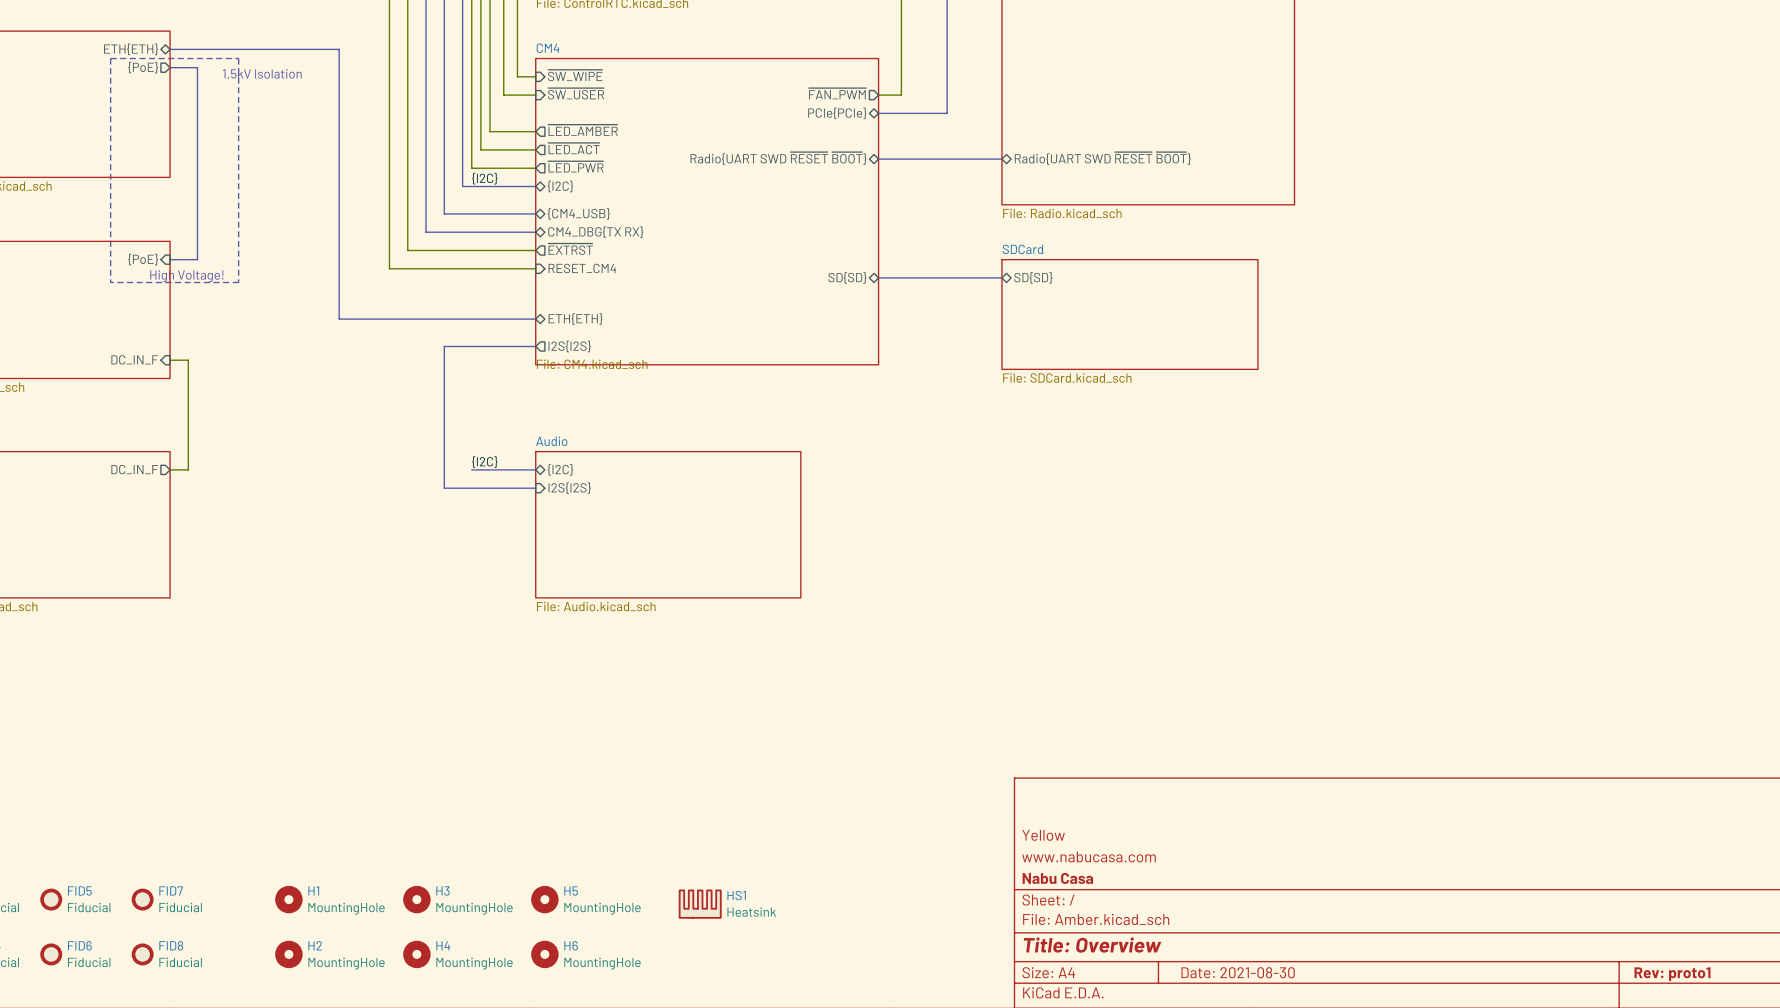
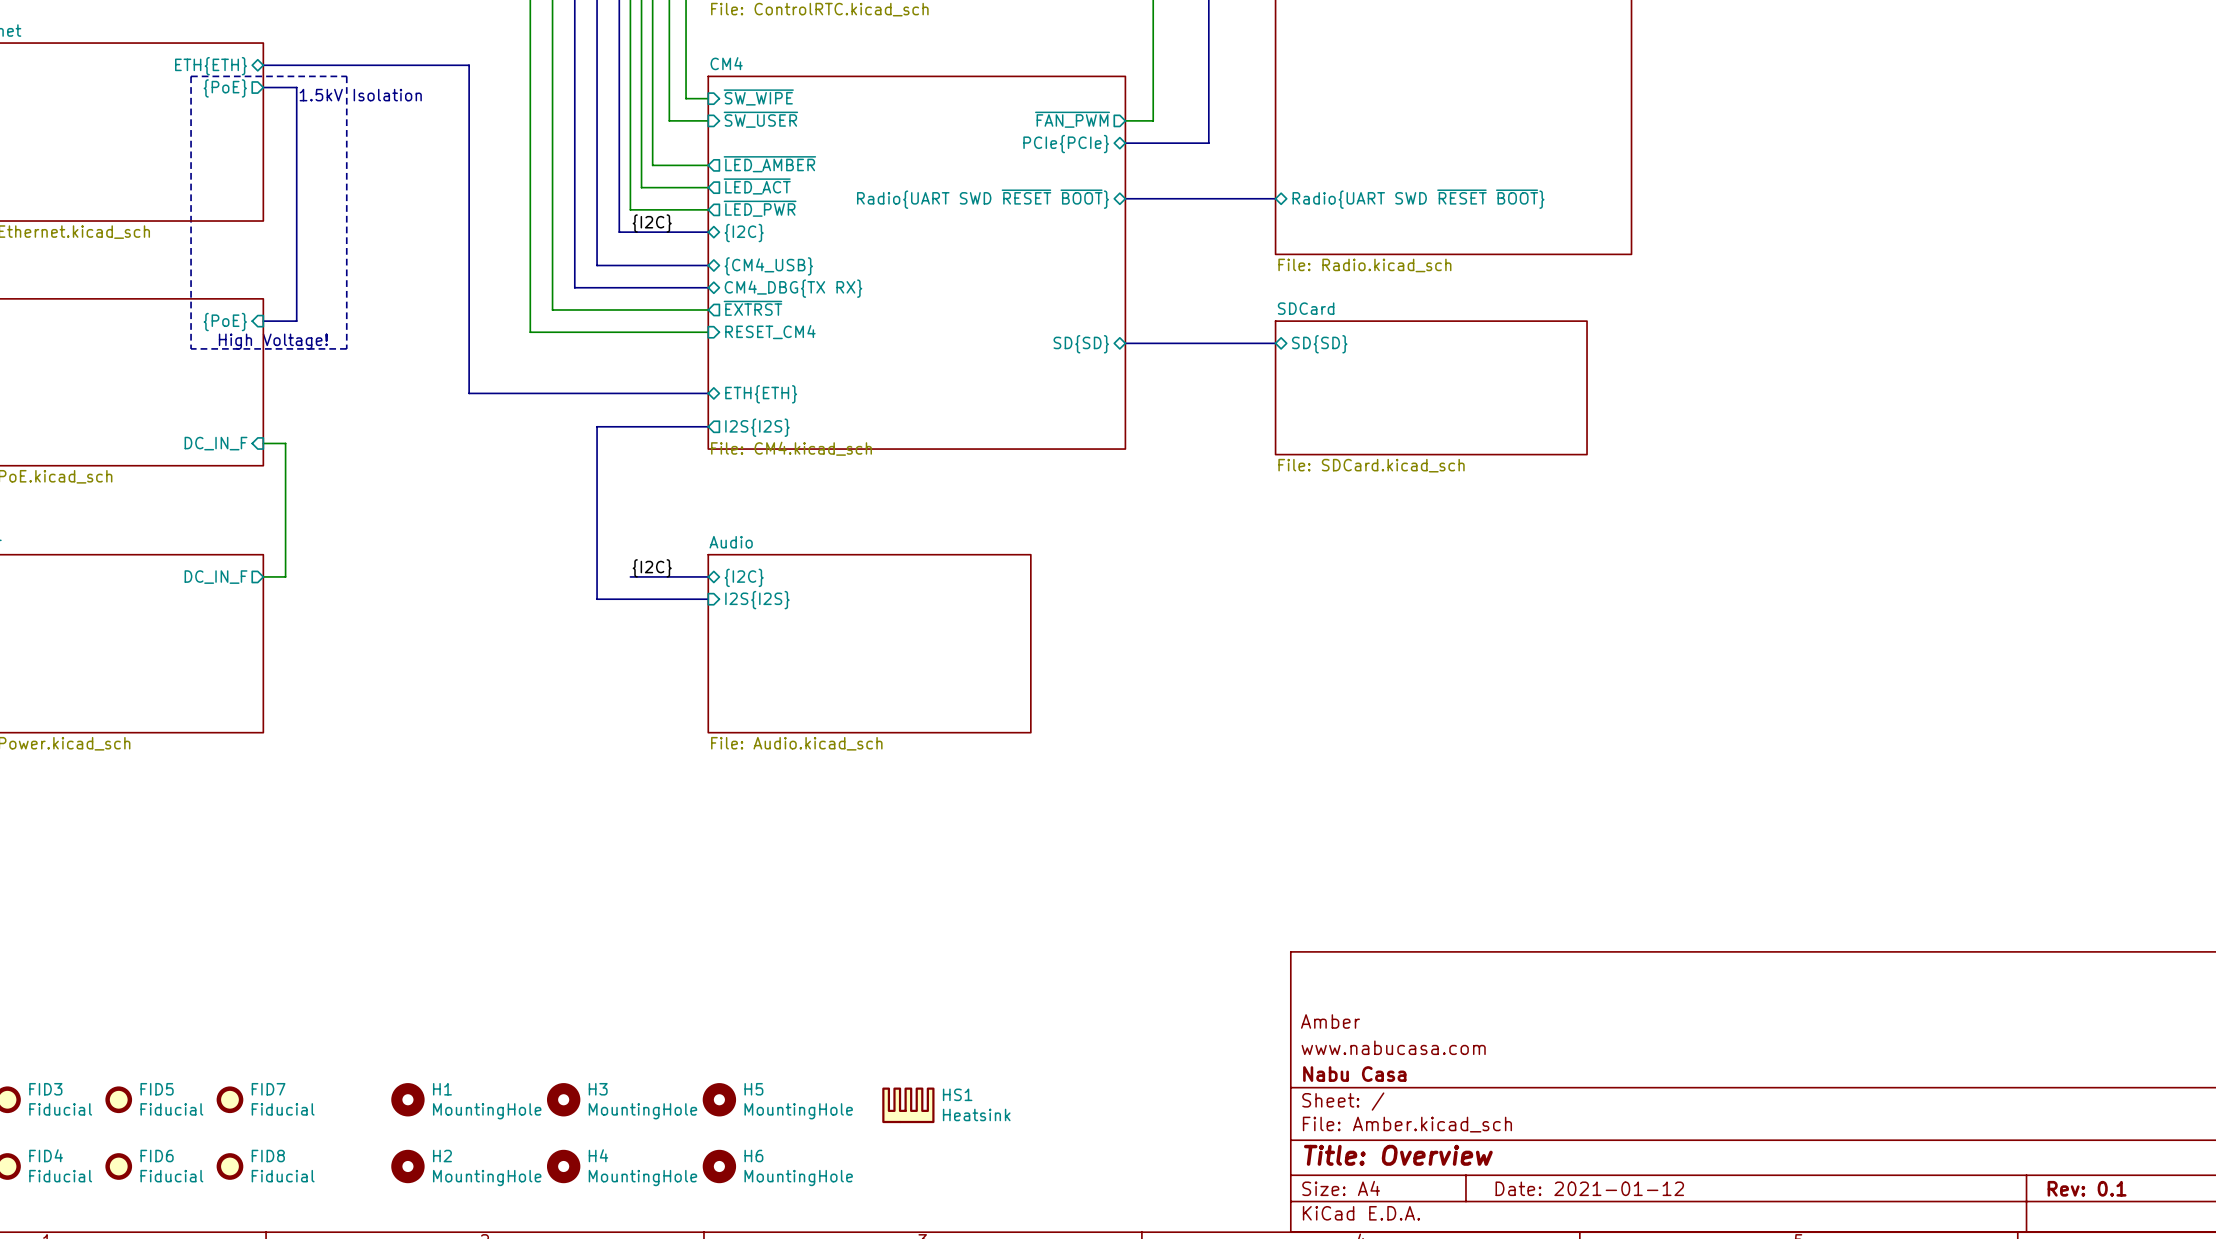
title block: Yellow (1043, 835) -> Amber (1330, 1021)
title block: Date: 2021-08-30 (1238, 972) -> Date: 2021-01-12 (1589, 1188)
title block: Rev: proto1 (1672, 974) -> Rev: 0.1 (2087, 1188)

